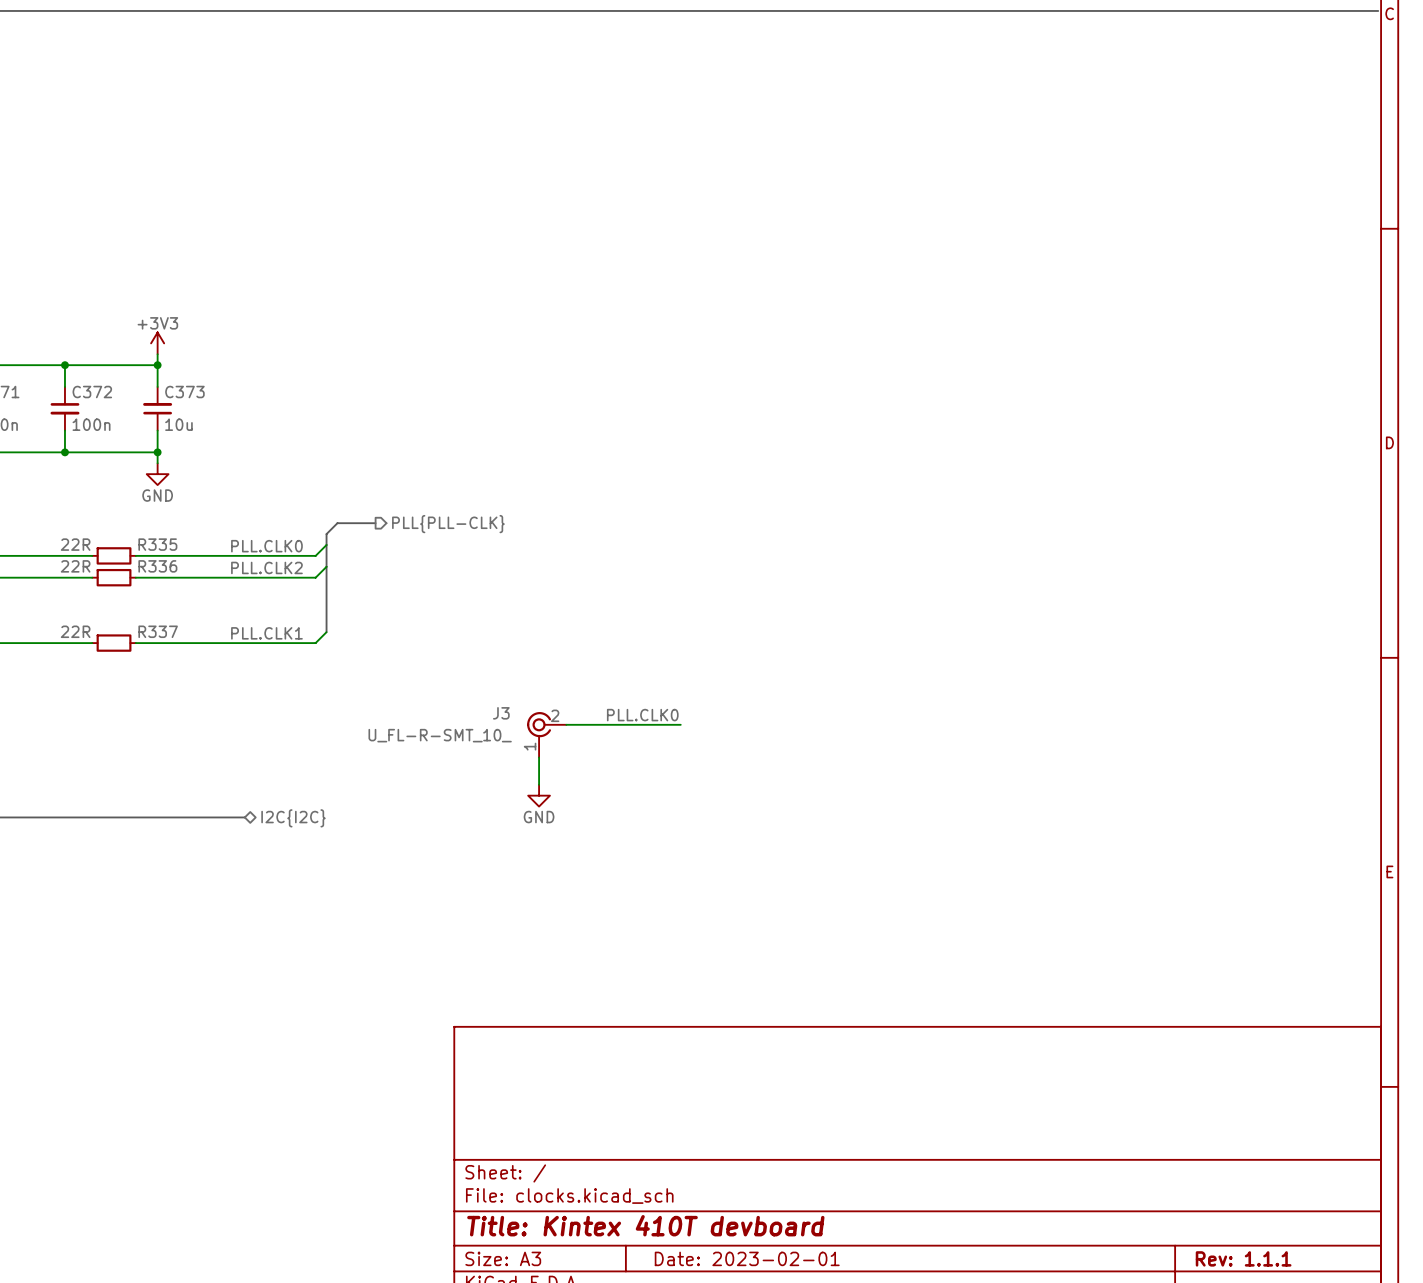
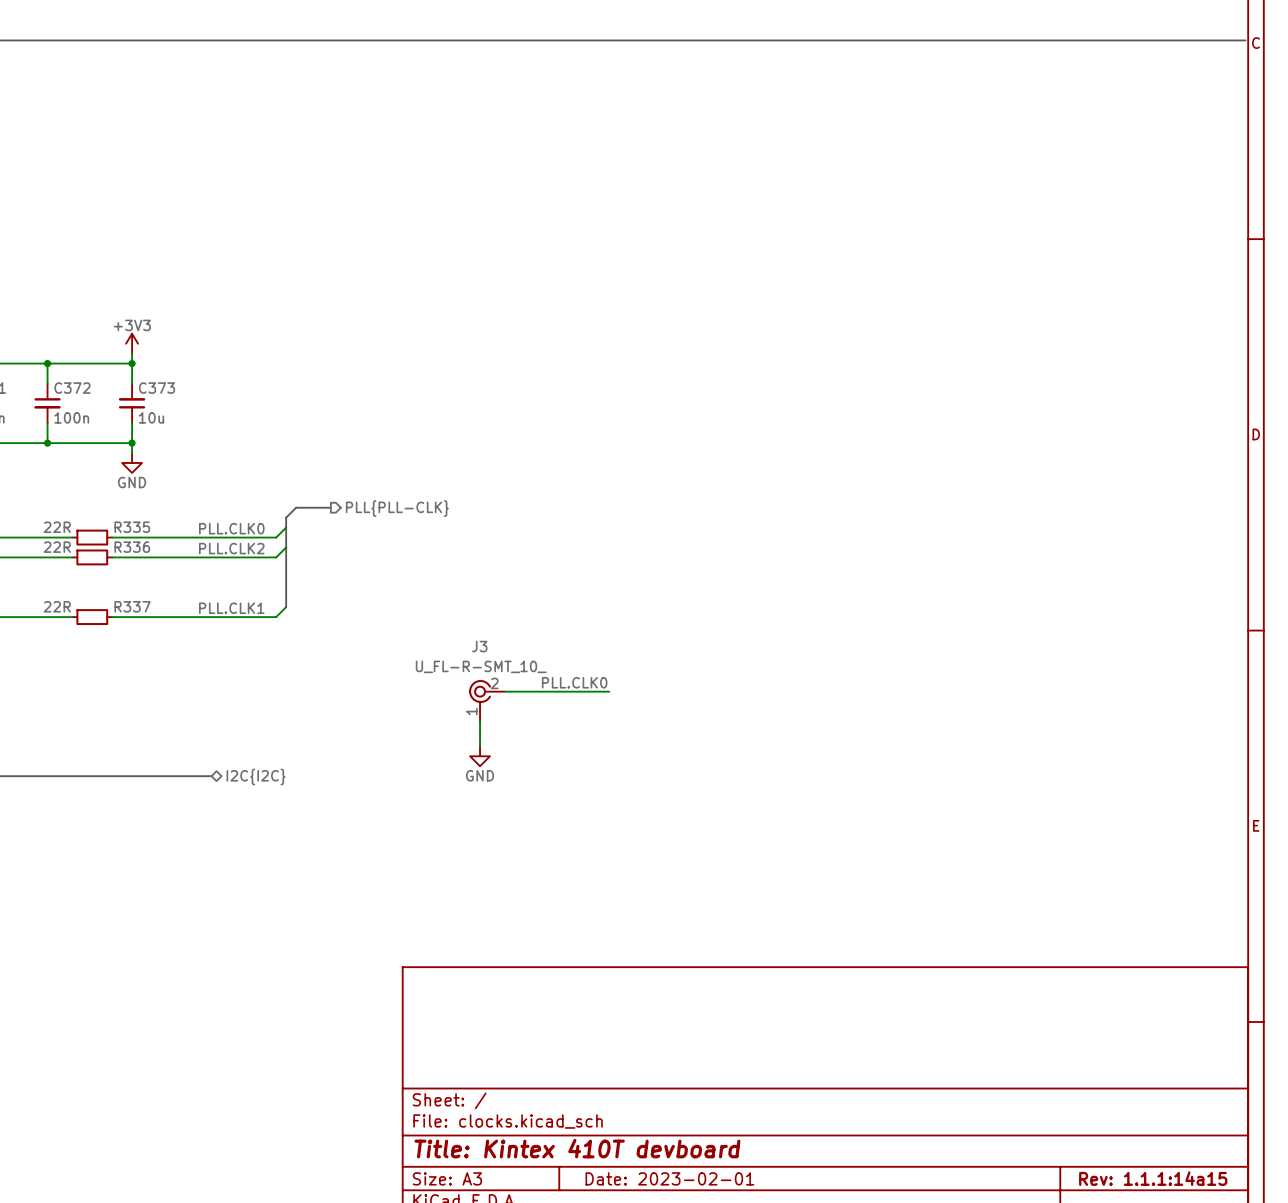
J3 name position: J3 (501, 713) -> J3 (479, 646)
J3 value position: U_FL-R-SMT_10_ (440, 735) -> U_FL-R-SMT_10_ (481, 666)
title block: Rev: 1.1.1 (1243, 1258) -> Rev: 1.1.1:14a15 (1153, 1178)

